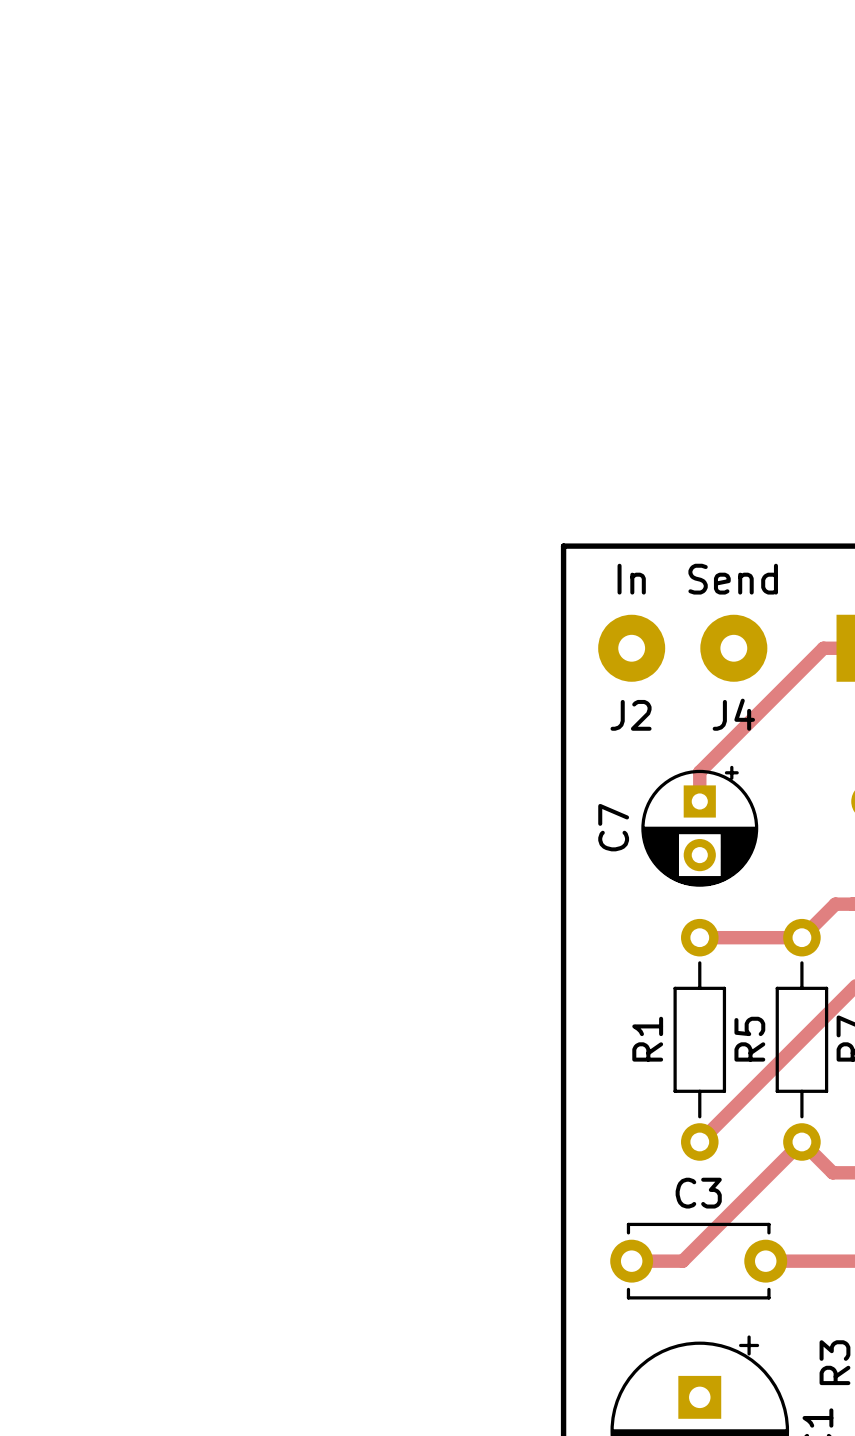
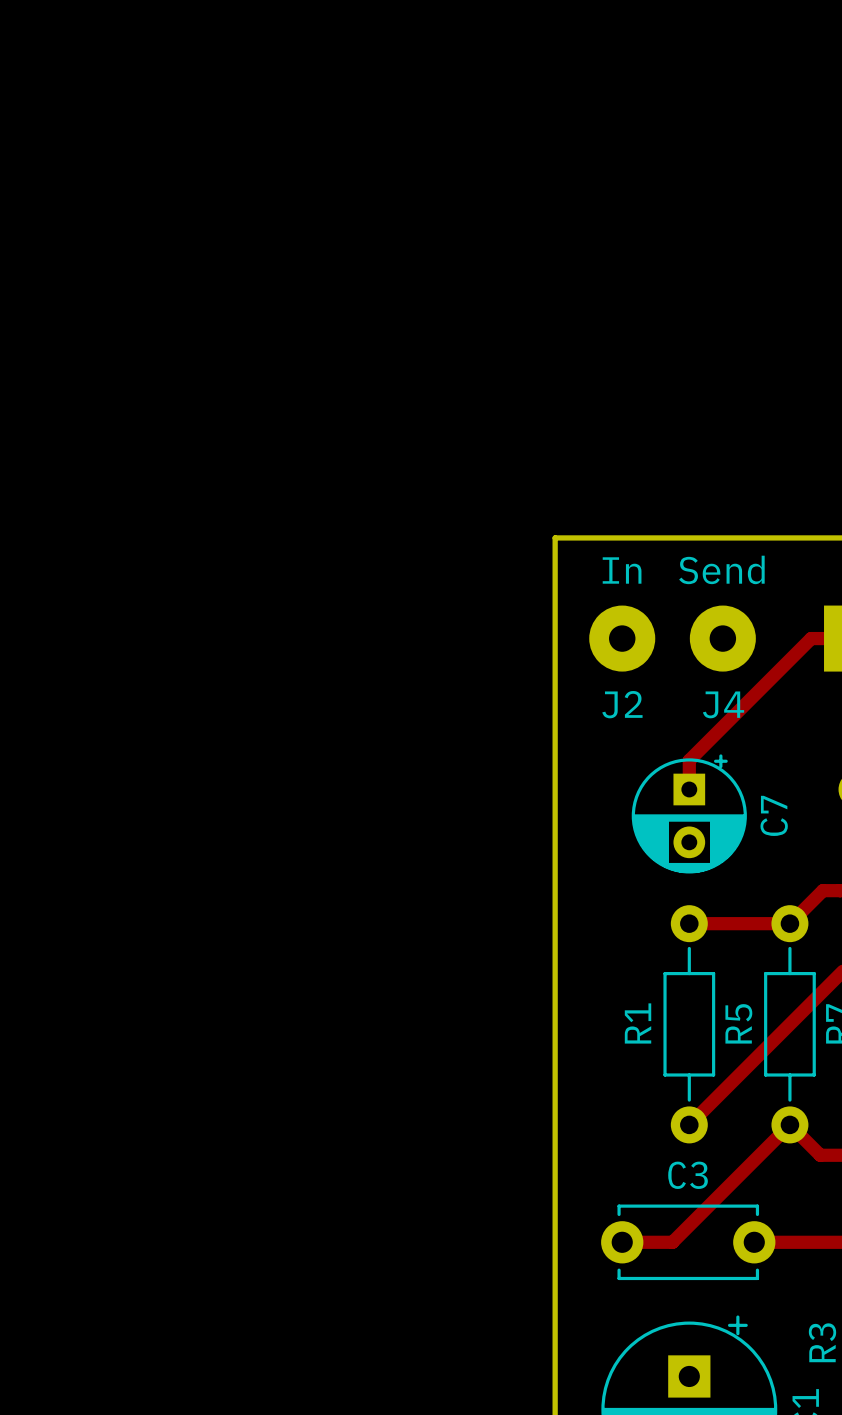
C7 name position: C7 (613, 827) -> C7 (774, 815)

